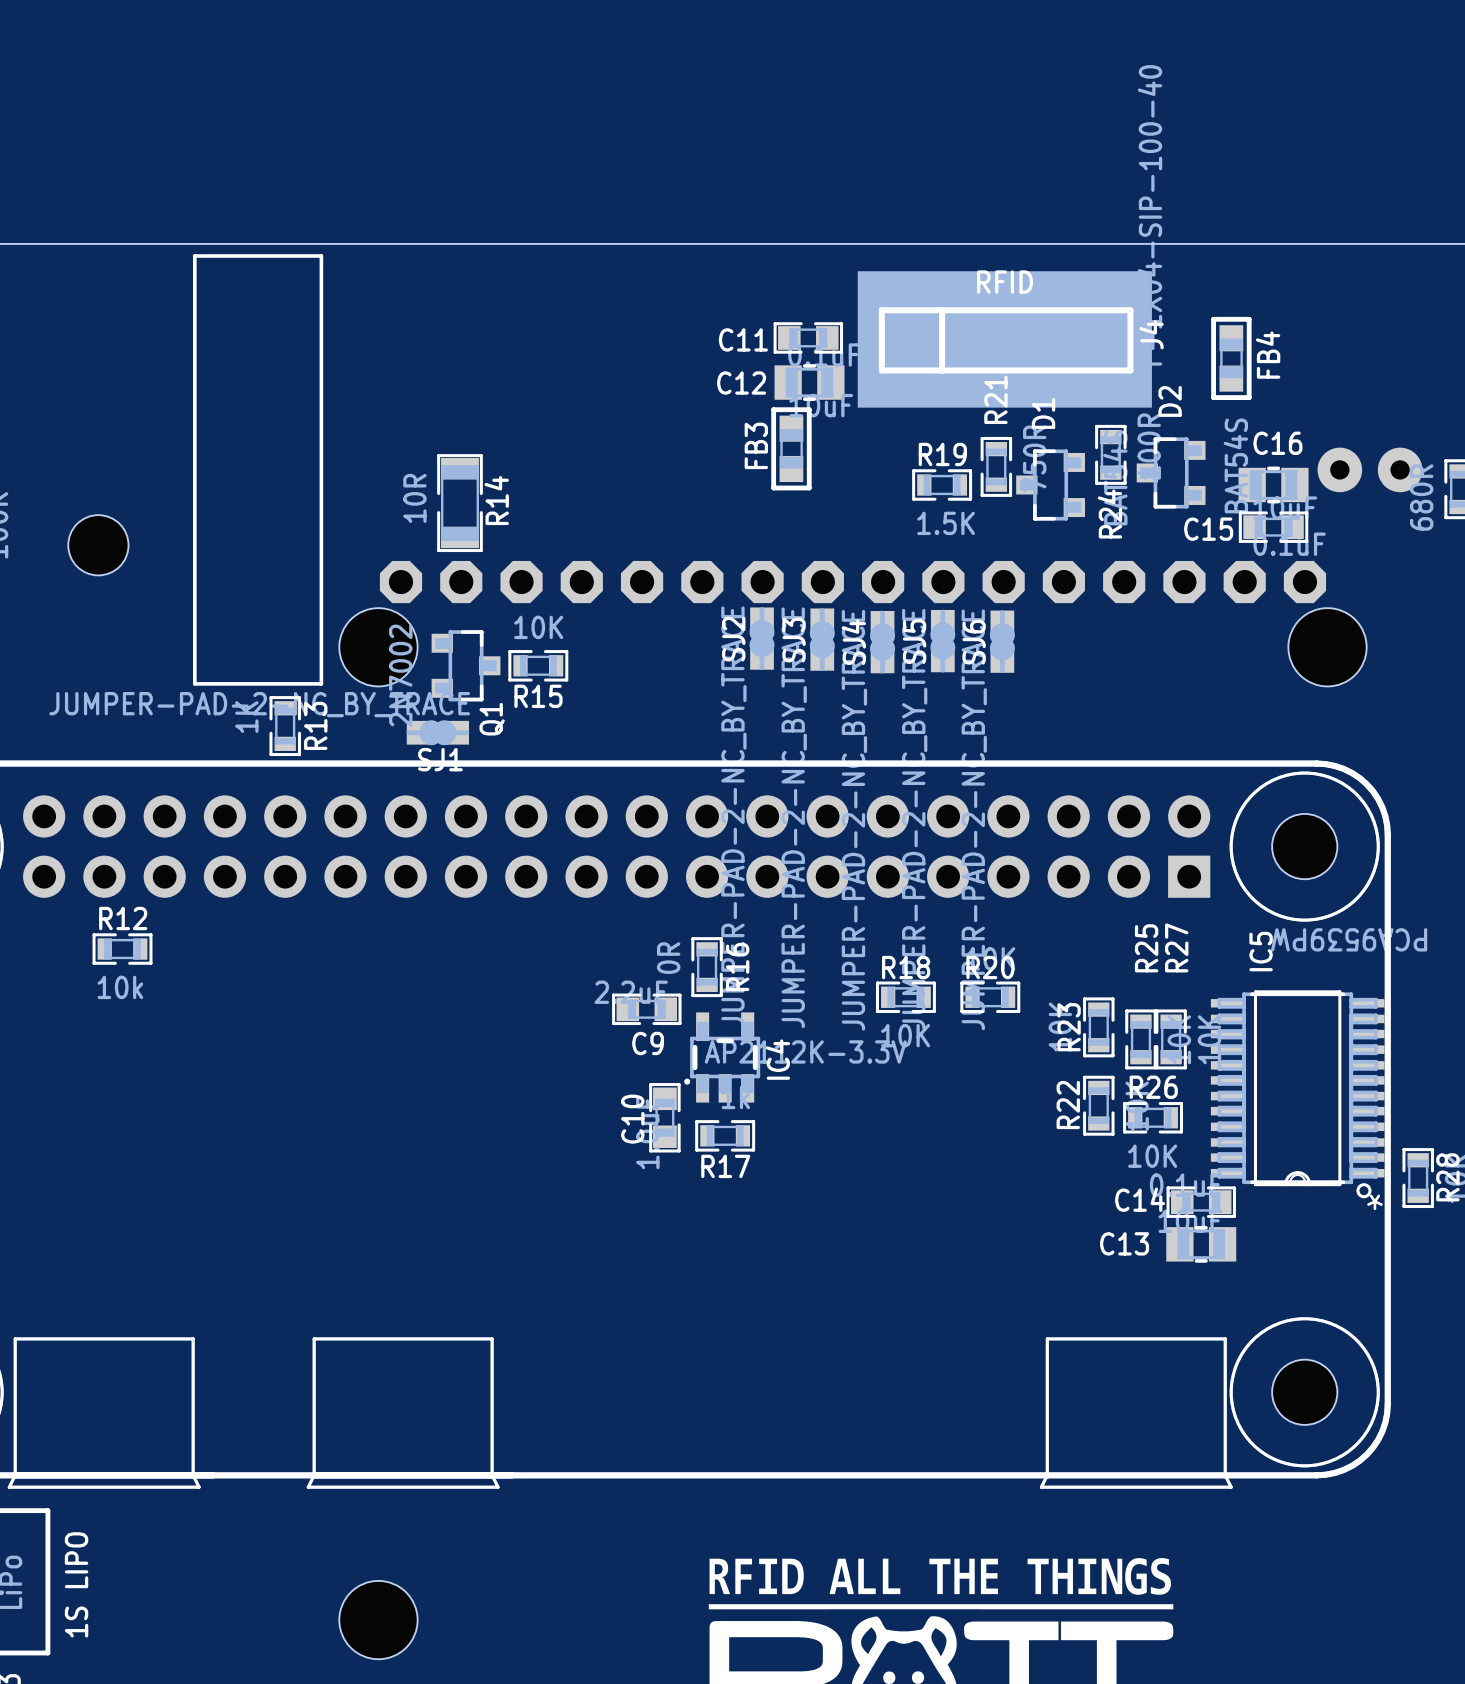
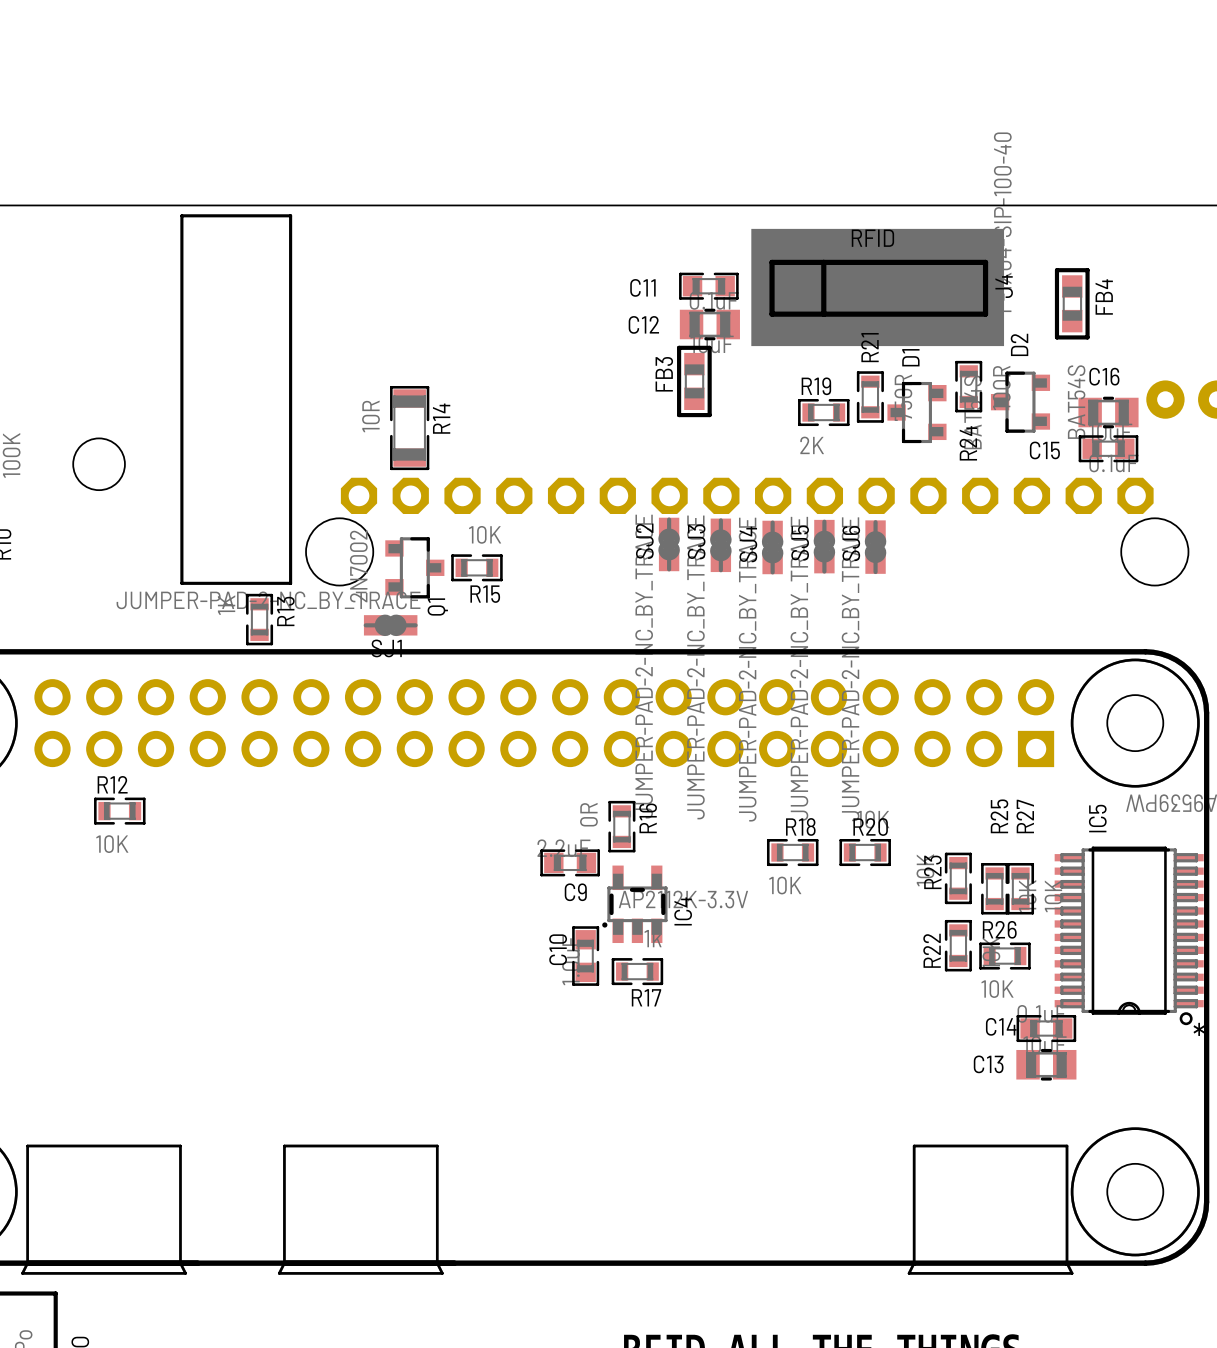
R19 value: 1.5K (946, 523) -> 2K (812, 445)
R12 value: 10k (120, 987) -> 10K (112, 844)

